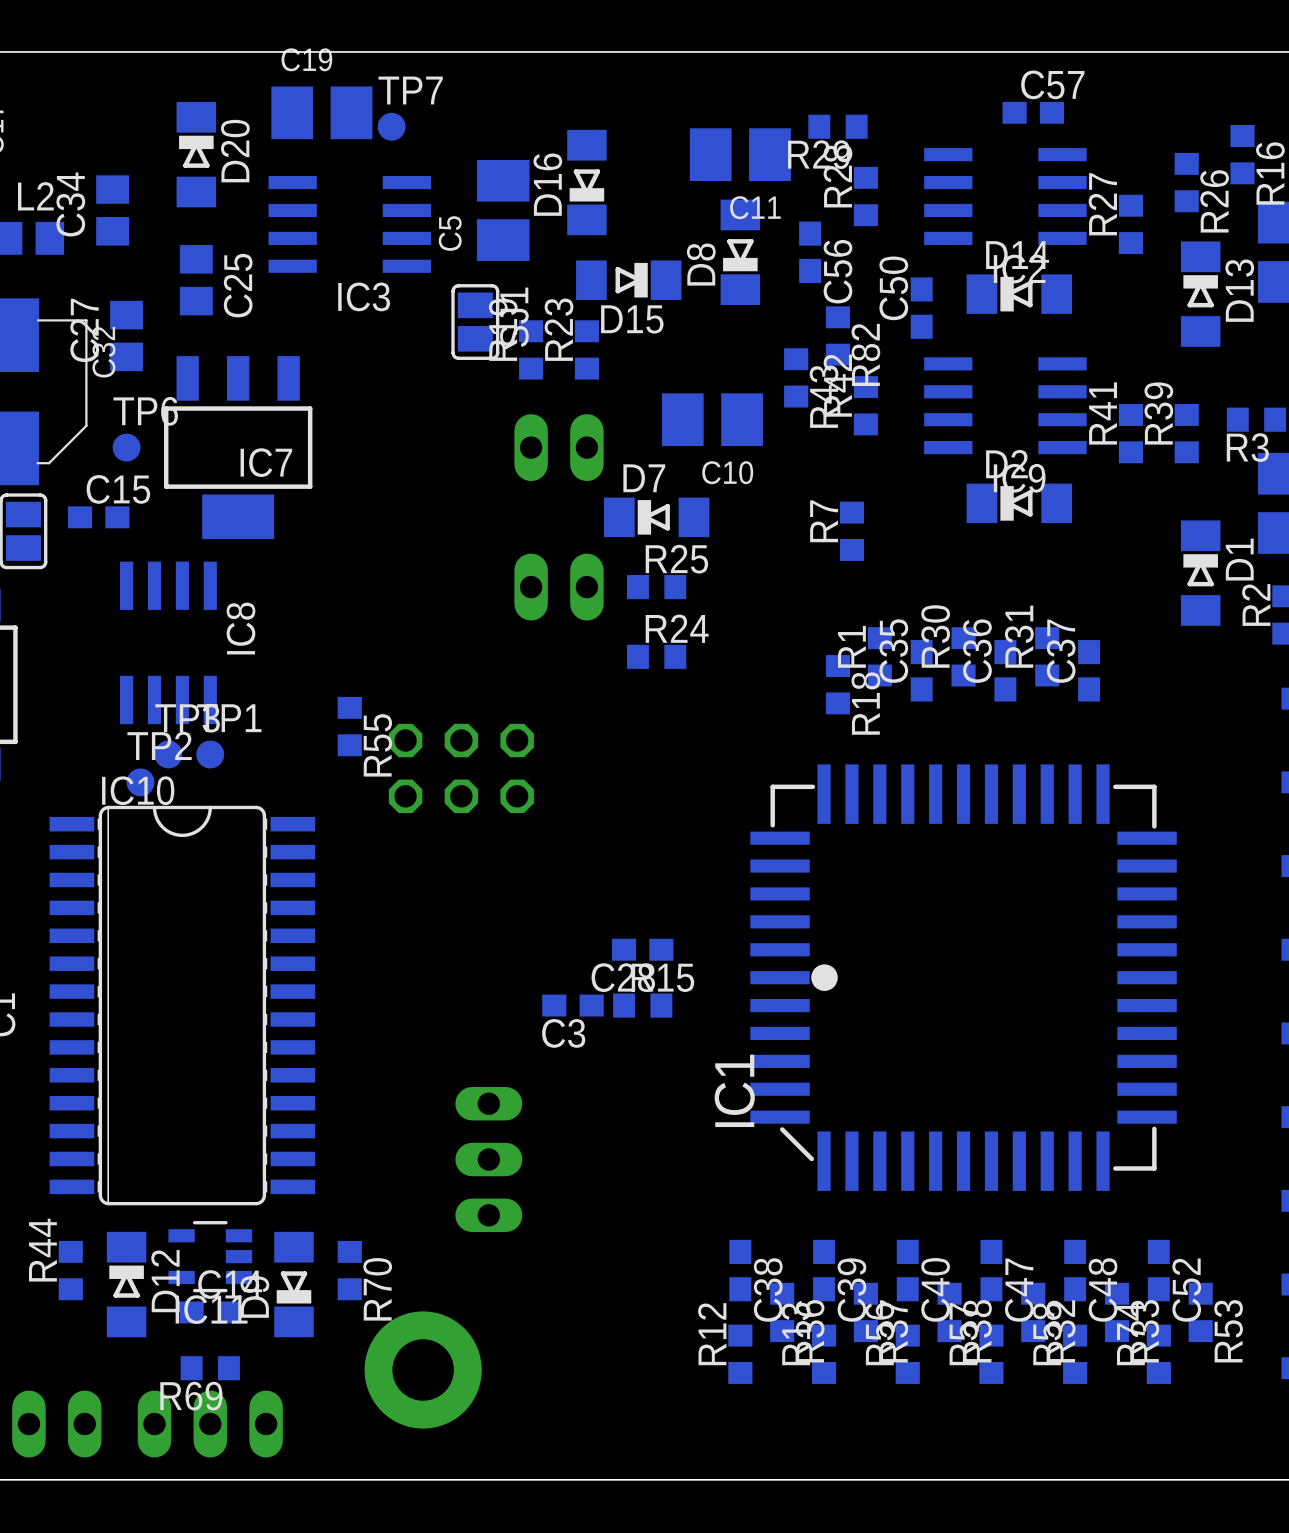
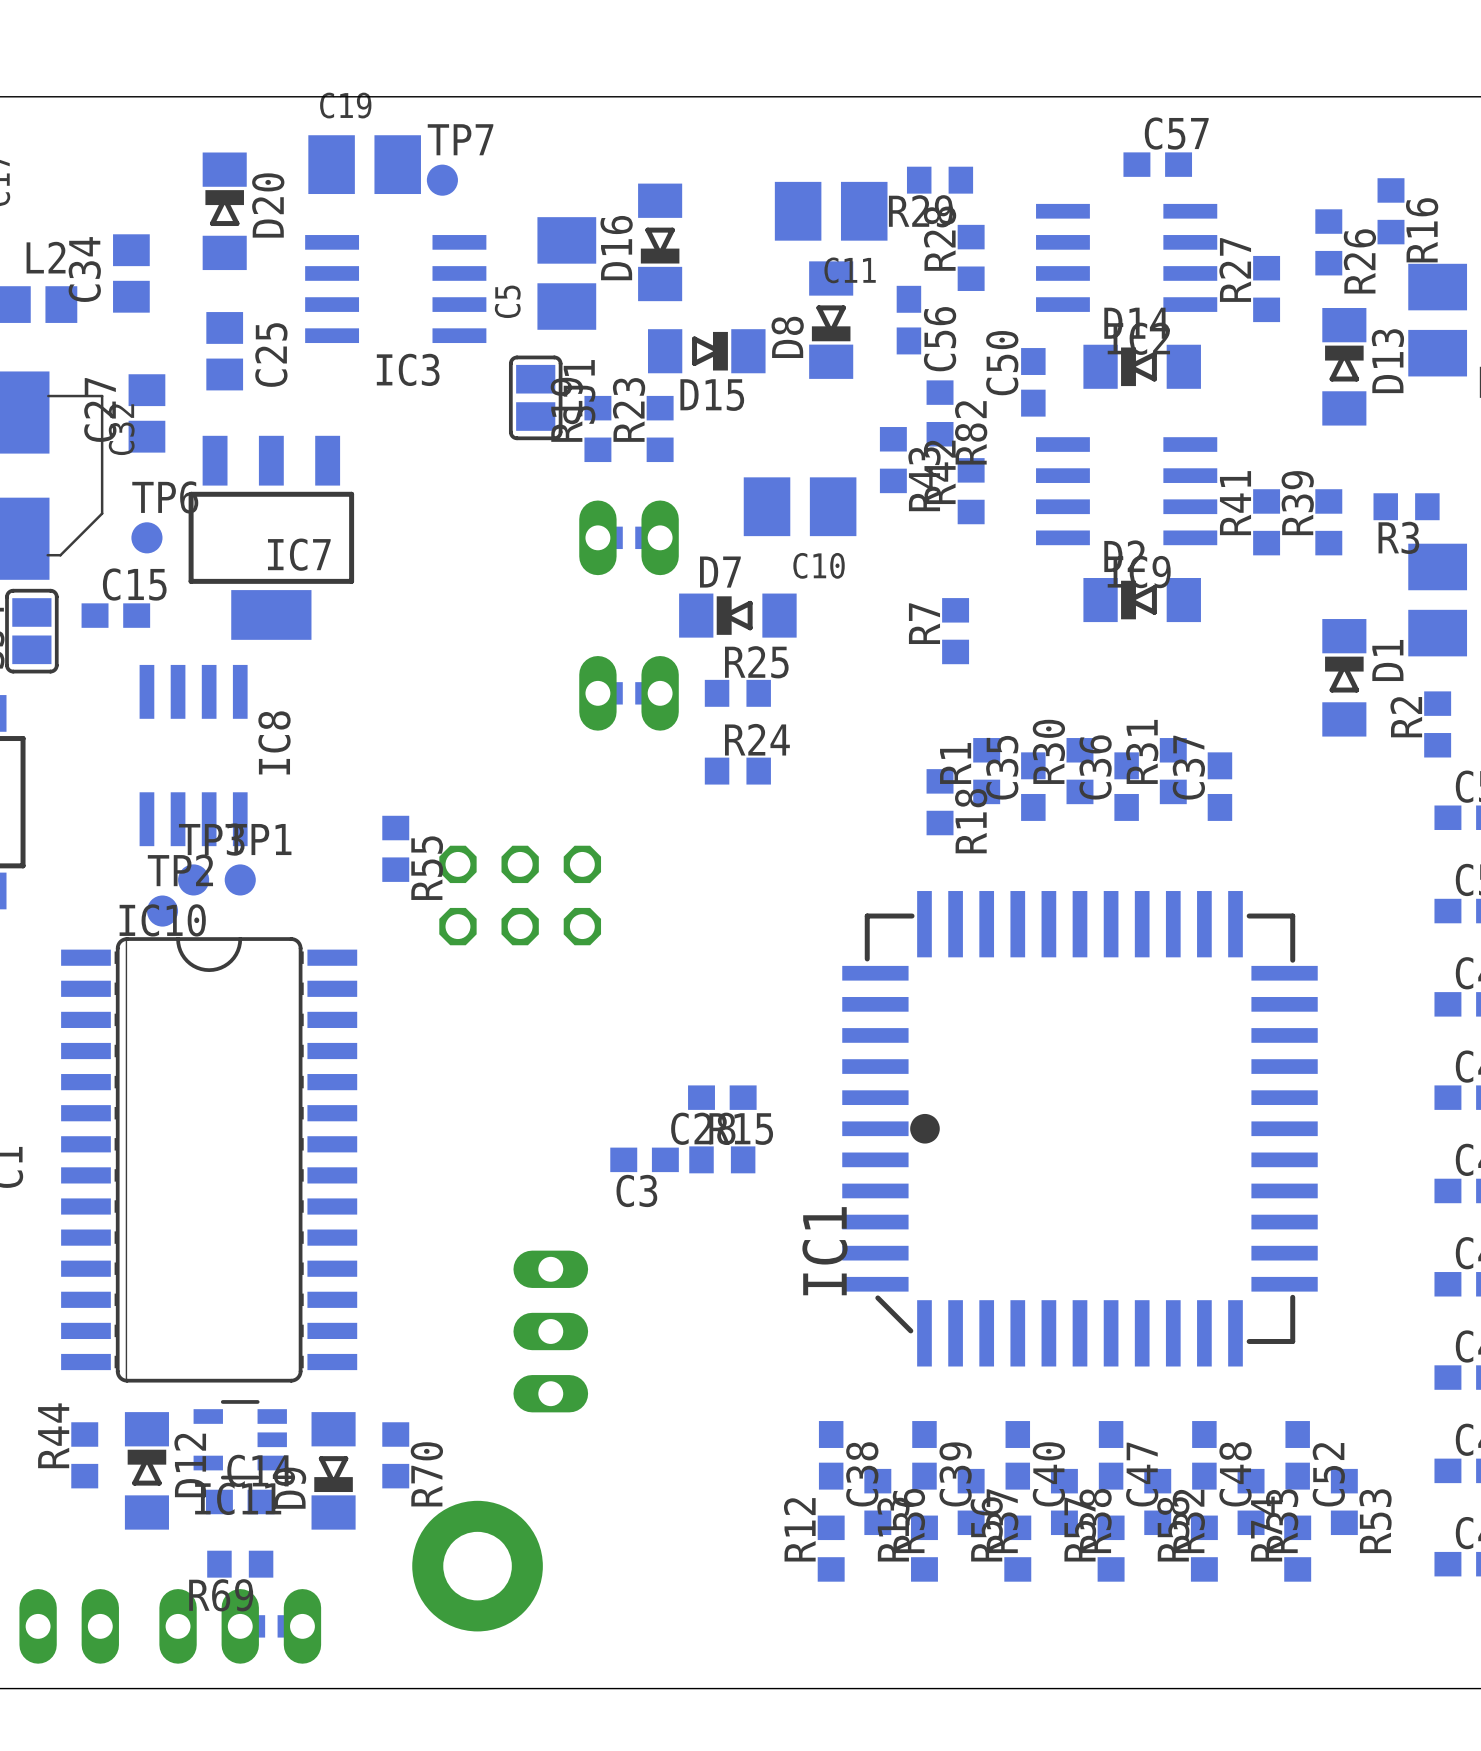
part: none -> (629, 537)
part: none -> (629, 693)
part: none -> (271, 1626)

